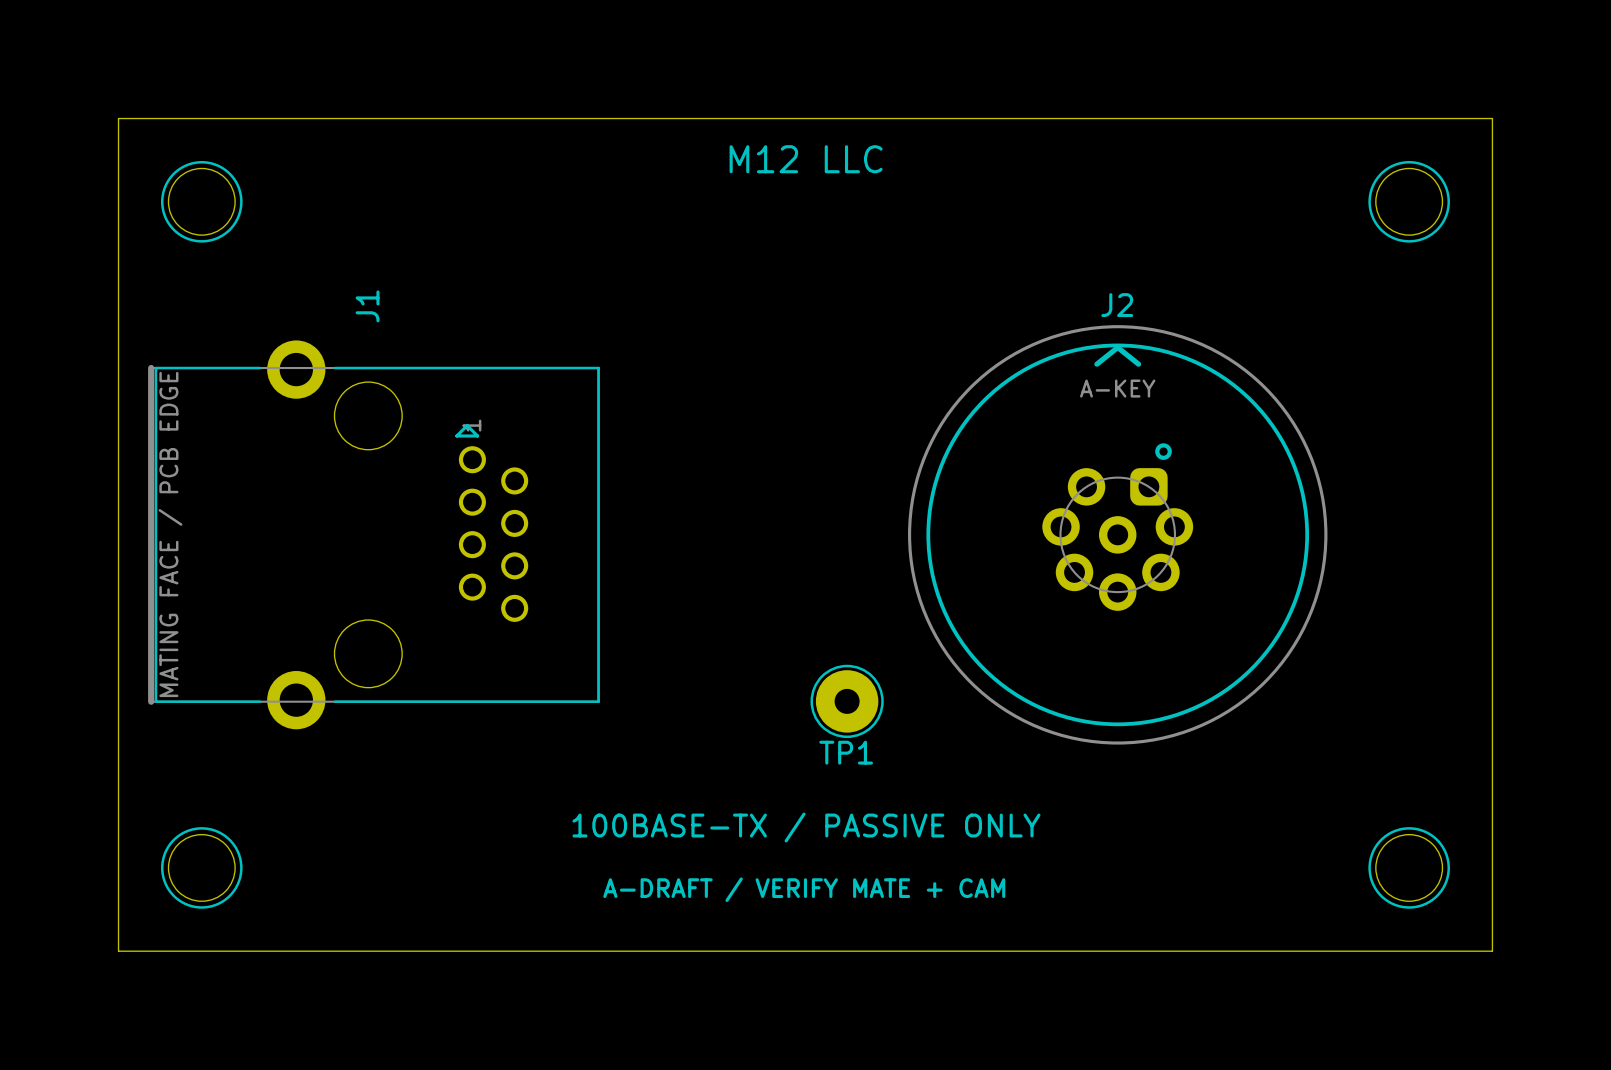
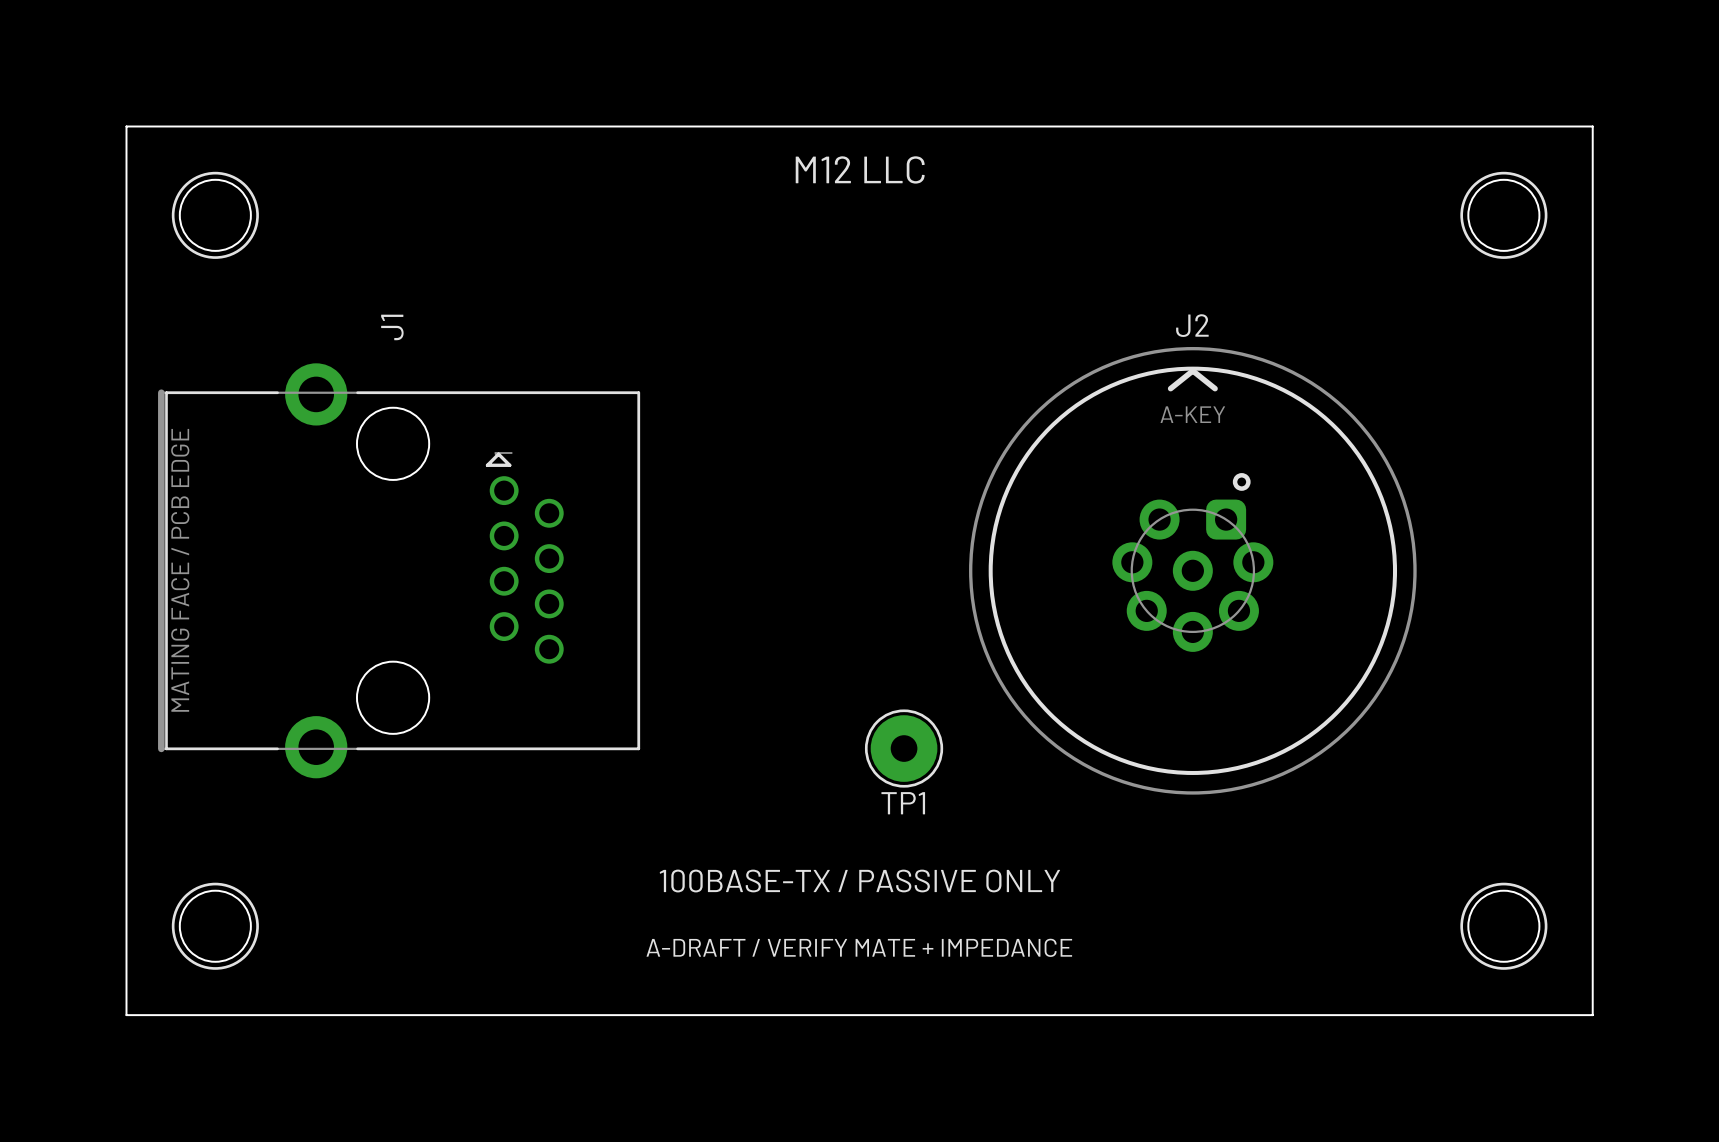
text: A-DRAFT / VERIFY MATE + CAM (804, 889) -> A-DRAFT / VERIFY MATE + IMPEDANCE (859, 947)

